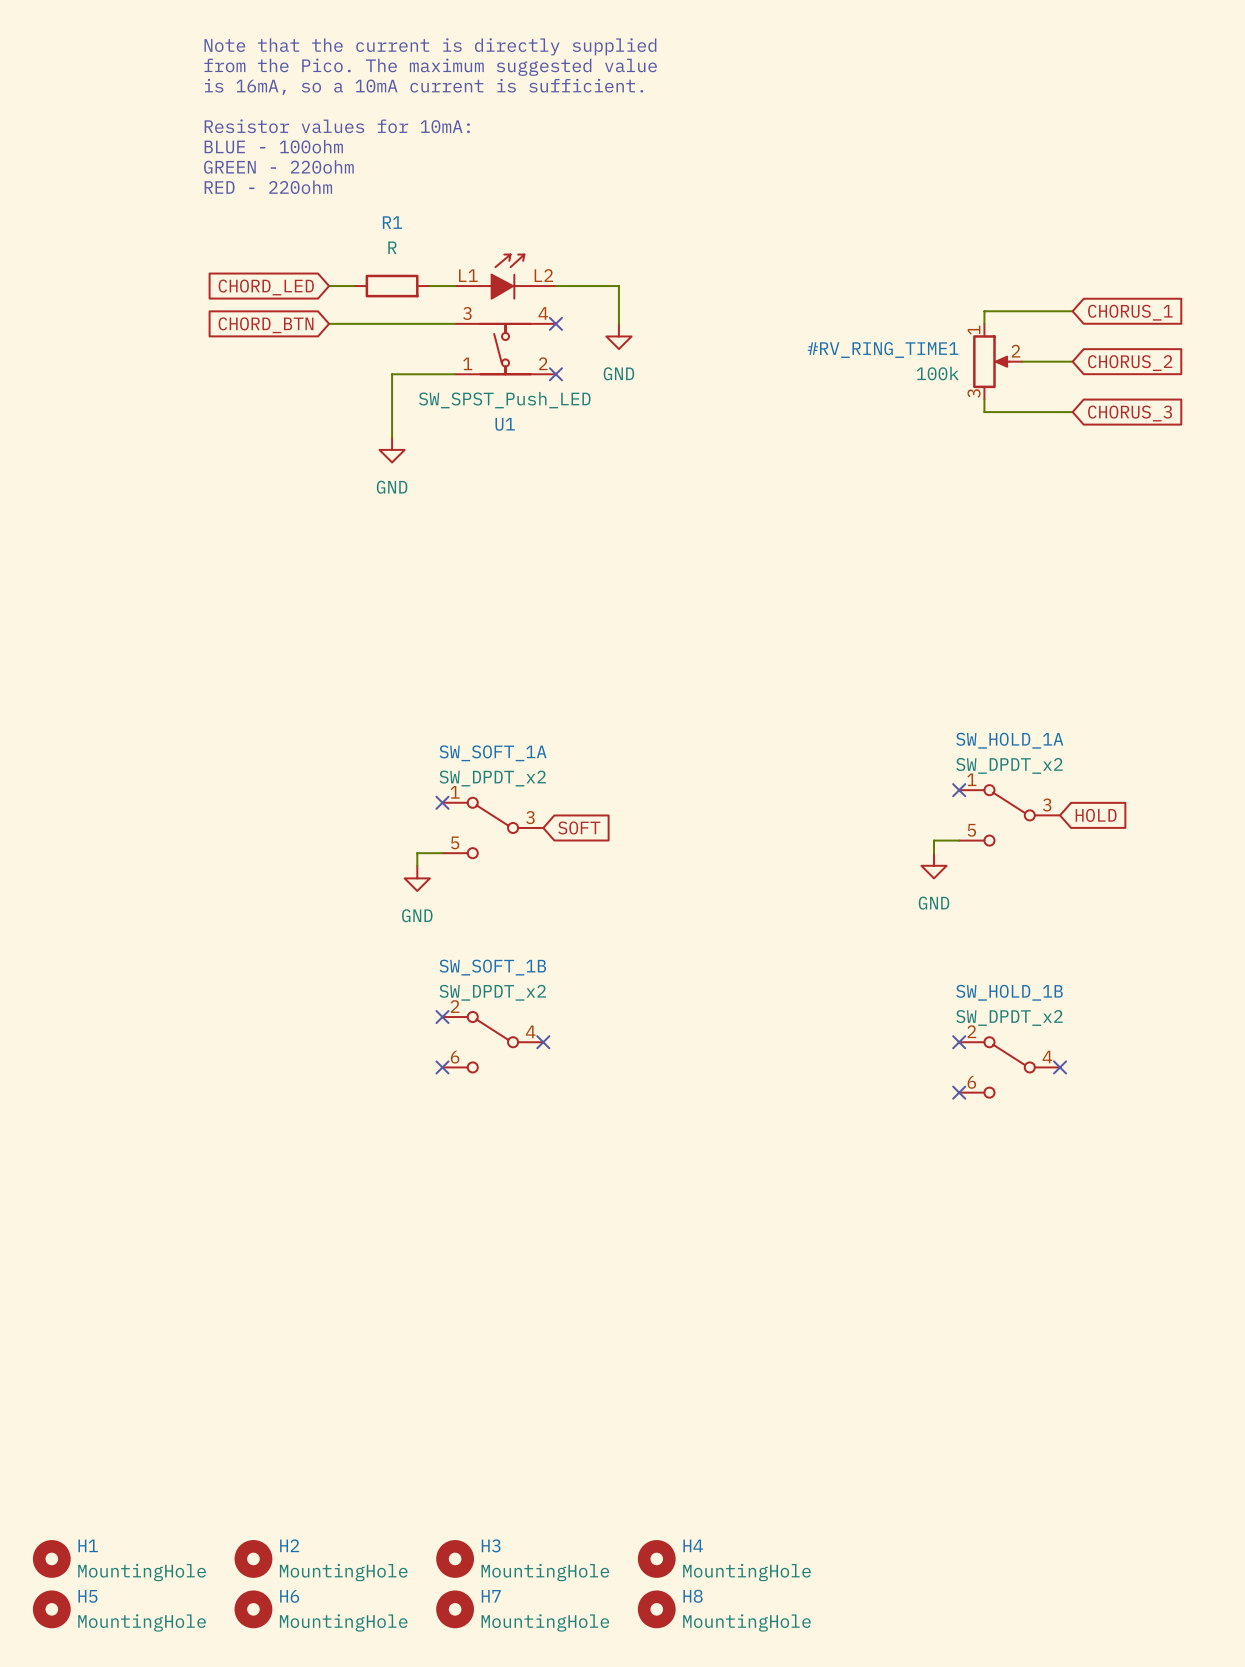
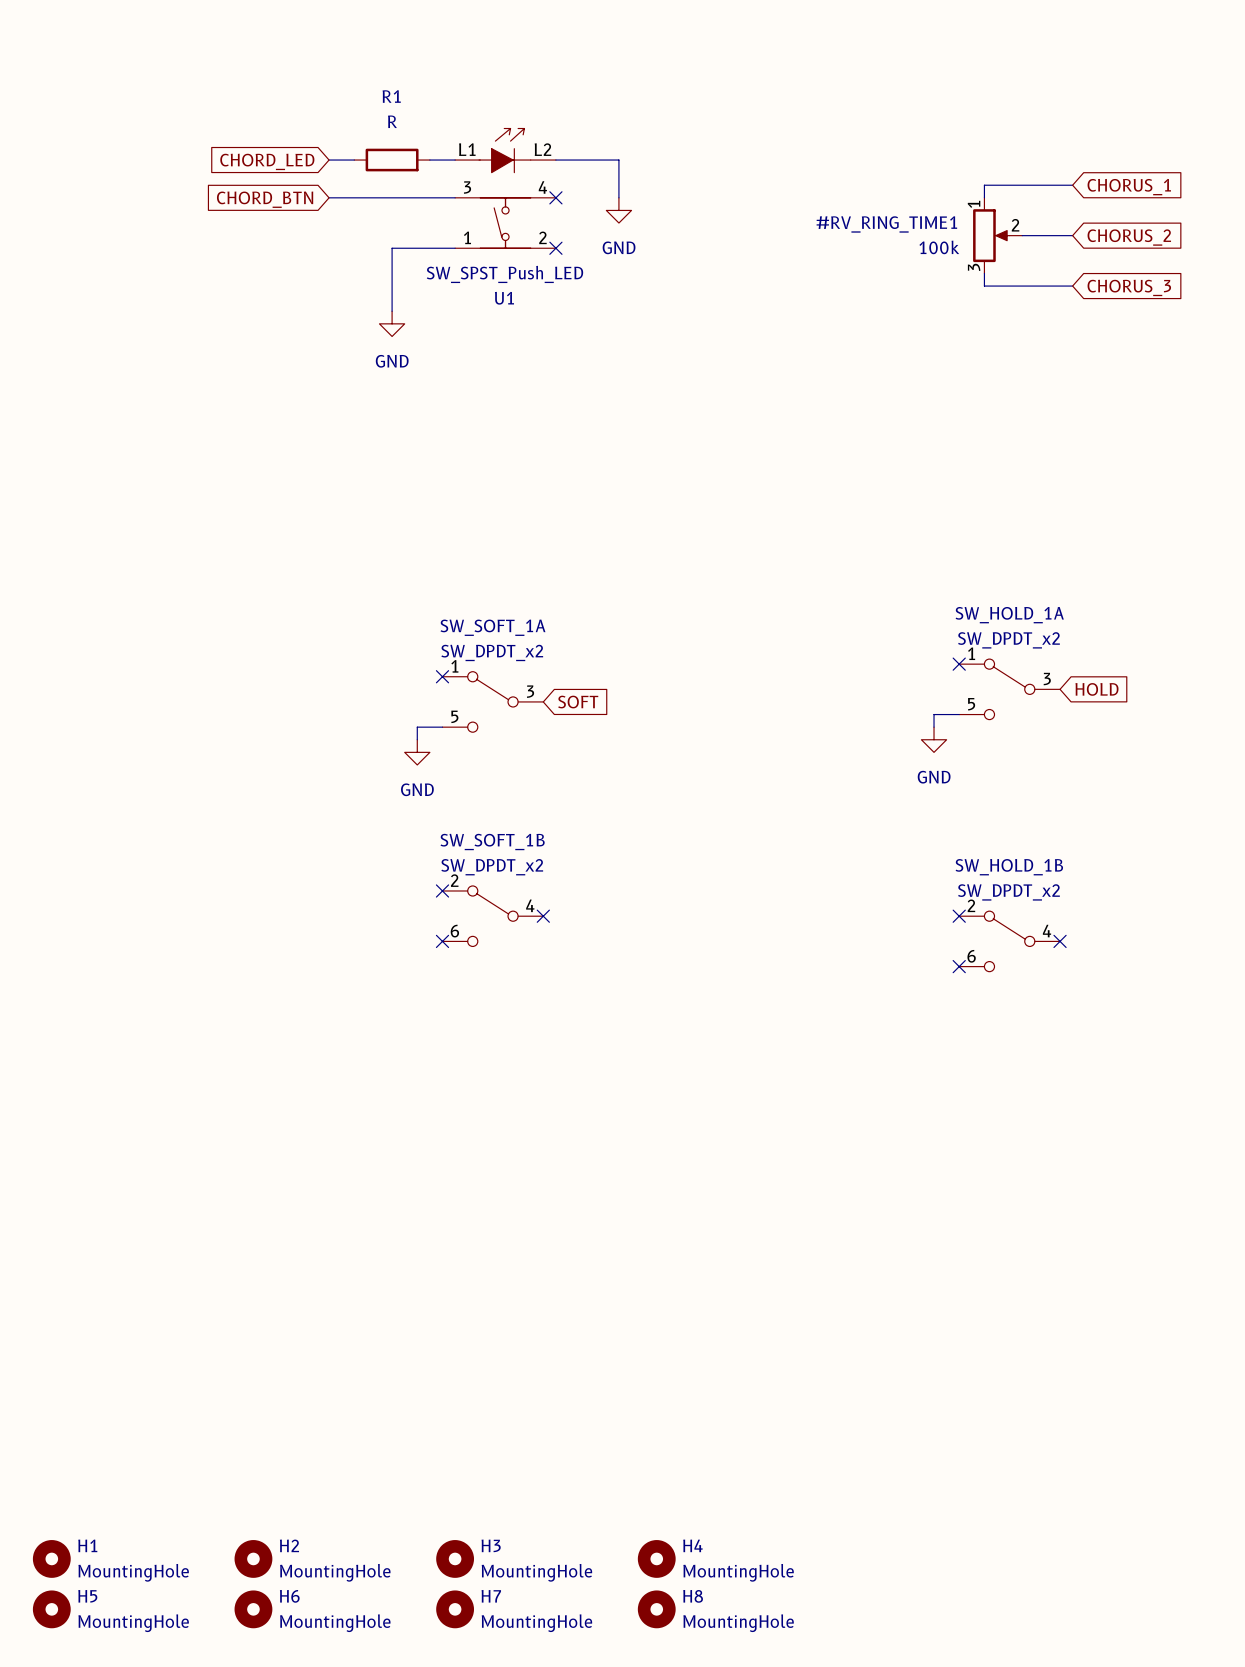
text: Note that the current is directly supplied (430, 46) -> none
text: from the Pico. The maximum suggested value (430, 67) -> none
text: is 16mA, so a 10mA current is sufficient. (424, 86) -> none
text: Resistor values for 10mA: (337, 126) -> none
text: BLUE - 100ohm (273, 146) -> none
text: GREEN - 220ohm (278, 166) -> none
text: RED - 220ohm (268, 187) -> none
no-connect mark: none -> (555, 197)
power symbol: none -> GND (618, 210)
no-connect mark: none -> (555, 248)
wire: (329, 286) (354, 286) -> (329, 160) (354, 160)
R1 position: (392, 286) -> (392, 160)
wire: (429, 286) (455, 286) -> (429, 160) (455, 160)
wire: (555, 286) (618, 286) (618, 323) -> (555, 160) (618, 160) (618, 197)
global label position: CHORD_LED (266, 287) -> CHORD_LED (267, 161)
wire: (1072, 311) (984, 311) (984, 323) -> (1072, 185) (984, 185) (984, 197)
global label position: CHORUS_1 (1130, 312) -> CHORUS_1 (1129, 187)
U1 position: (505, 314) -> (505, 188)
wire: (329, 323) (455, 323) -> (329, 197) (455, 197)
power symbol: none -> GND (392, 323)
no-connect mark: (555, 323) -> none
global label position: CHORD_BTN (266, 325) -> CHORD_BTN (265, 199)
power symbol: GND (618, 336) -> none
#RV_RING_TIME1 position: 100k (997, 361) -> 100k (997, 235)
wire: (1022, 361) (1072, 361) -> (1022, 235) (1072, 235)
global label position: CHORUS_2 (1130, 363) -> CHORUS_2 (1129, 237)
wire: (455, 374) (392, 374) (392, 437) -> (455, 248) (392, 248) (392, 311)
no-connect mark: (555, 374) -> none
wire: (984, 399) (984, 412) (1072, 412) -> (984, 273) (984, 286) (1072, 286)
global label position: CHORUS_3 (1130, 413) -> CHORUS_3 (1129, 287)
power symbol: GND (392, 449) -> none
no-connect mark: none -> (959, 664)
no-connect mark: none -> (442, 676)
no-connect mark: (959, 790) -> none
no-connect mark: (442, 802) -> none
SW_HOLD_1A position: (1009, 815) -> (1009, 689)
global label position: HOLD (1096, 815) -> HOLD (1096, 689)
SW_SOFT_1A position: (492, 827) -> (492, 701)
global label position: SOFT (579, 827) -> SOFT (578, 702)
wire: (959, 840) (934, 840) (934, 853) -> (959, 714) (934, 714) (934, 727)
wire: (442, 853) (417, 853) (417, 865) -> (442, 727) (417, 727) (417, 739)
power symbol position: GND (934, 865) -> GND (934, 739)
power symbol position: GND (417, 878) -> GND (417, 752)
no-connect mark: none -> (442, 890)
no-connect mark: none -> (543, 916)
no-connect mark: none -> (959, 916)
no-connect mark: none -> (442, 941)
no-connect mark: none -> (1060, 941)
no-connect mark: none -> (959, 966)
no-connect mark: (442, 1017) -> none
SW_SOFT_1B position: (492, 1042) -> (492, 916)
no-connect mark: (543, 1042) -> none
no-connect mark: (959, 1042) -> none
no-connect mark: (442, 1067) -> none
SW_HOLD_1B position: (1009, 1067) -> (1009, 941)
no-connect mark: (1060, 1067) -> none
no-connect mark: (959, 1092) -> none

